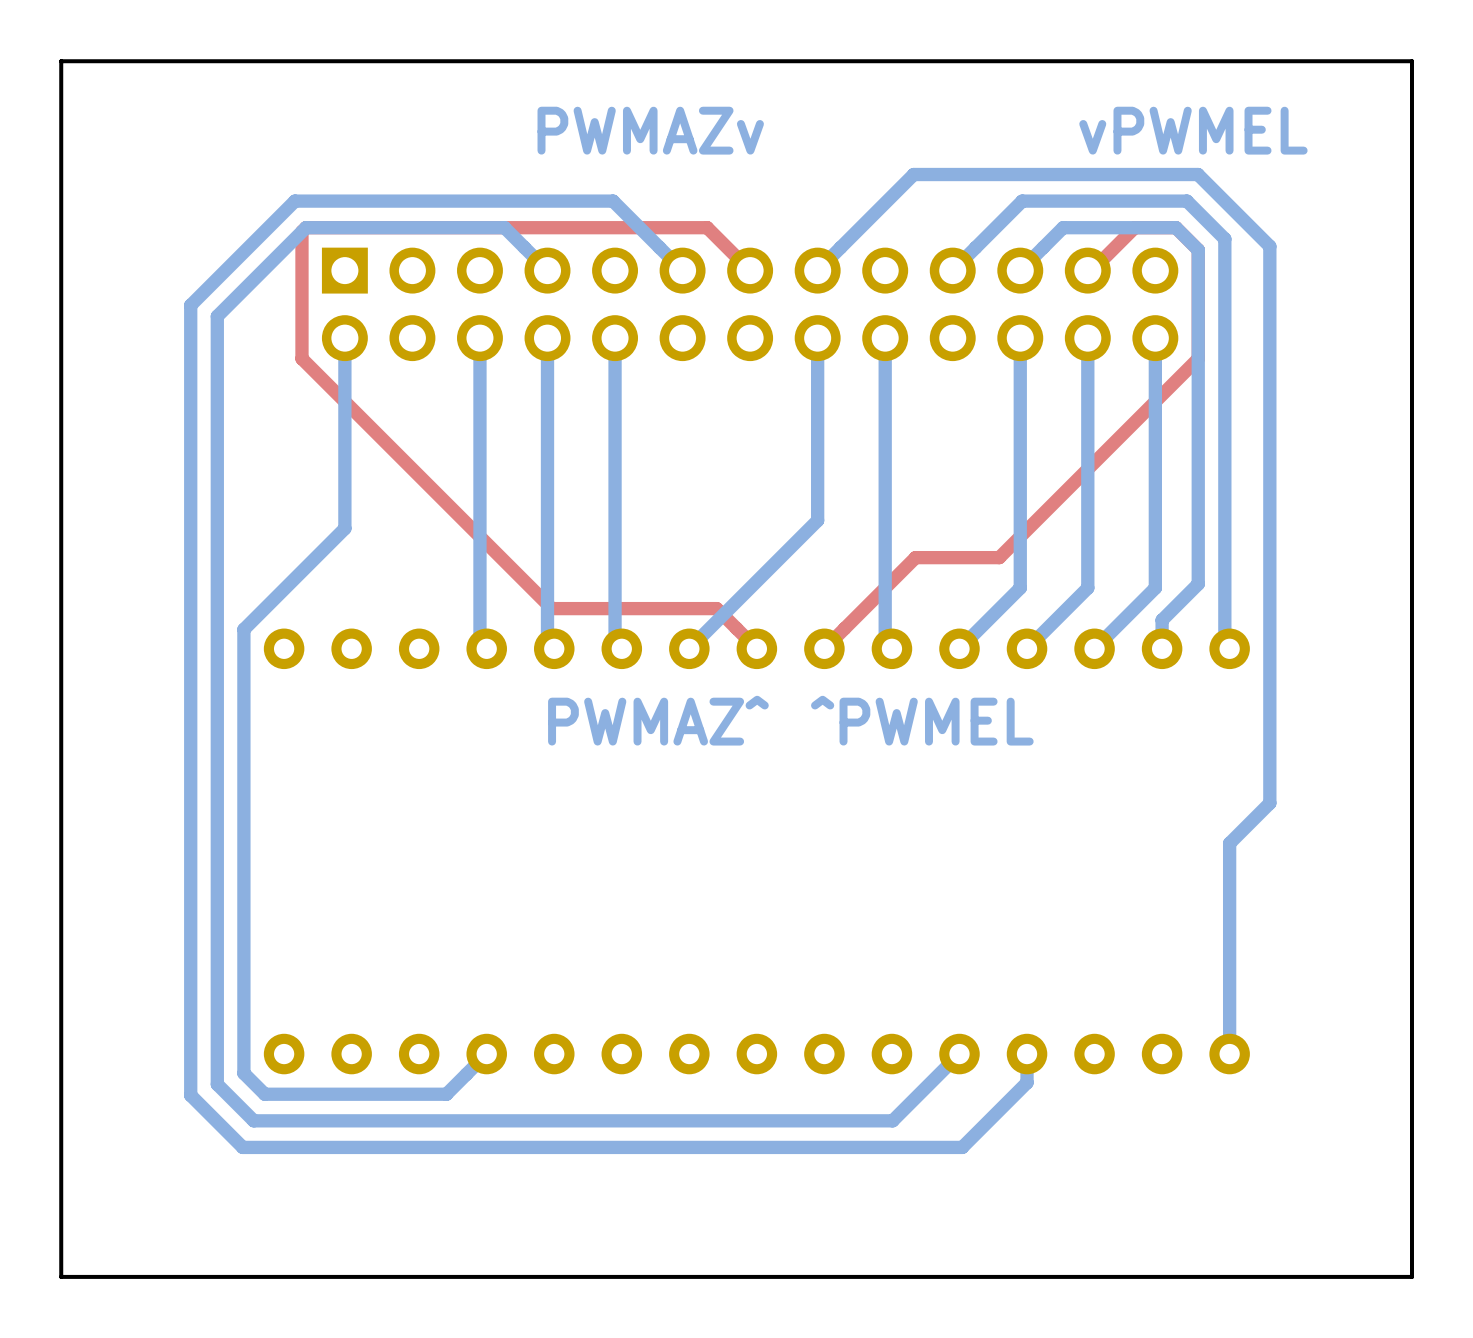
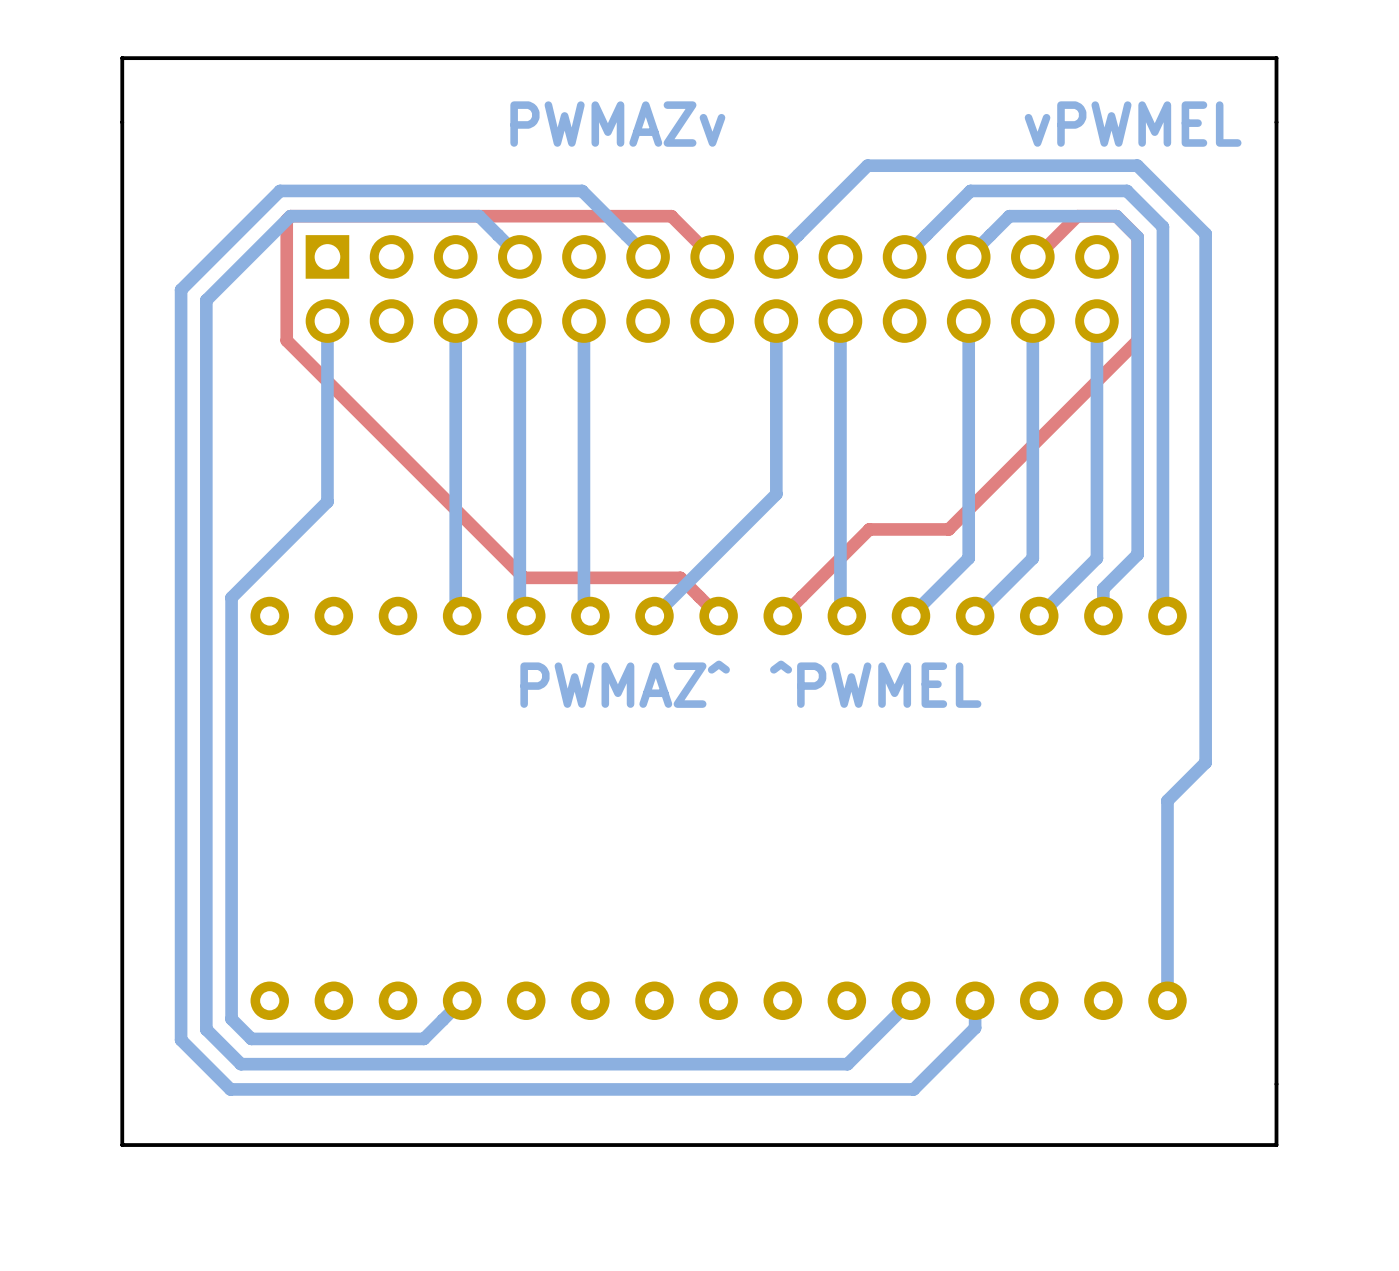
board edge: (1344, 61) (1411, 61) (1411, 1276) (61, 1276) (61, 61) (128, 61) -> (1276, 58) (1276, 1145) (122, 1145) (122, 58)

